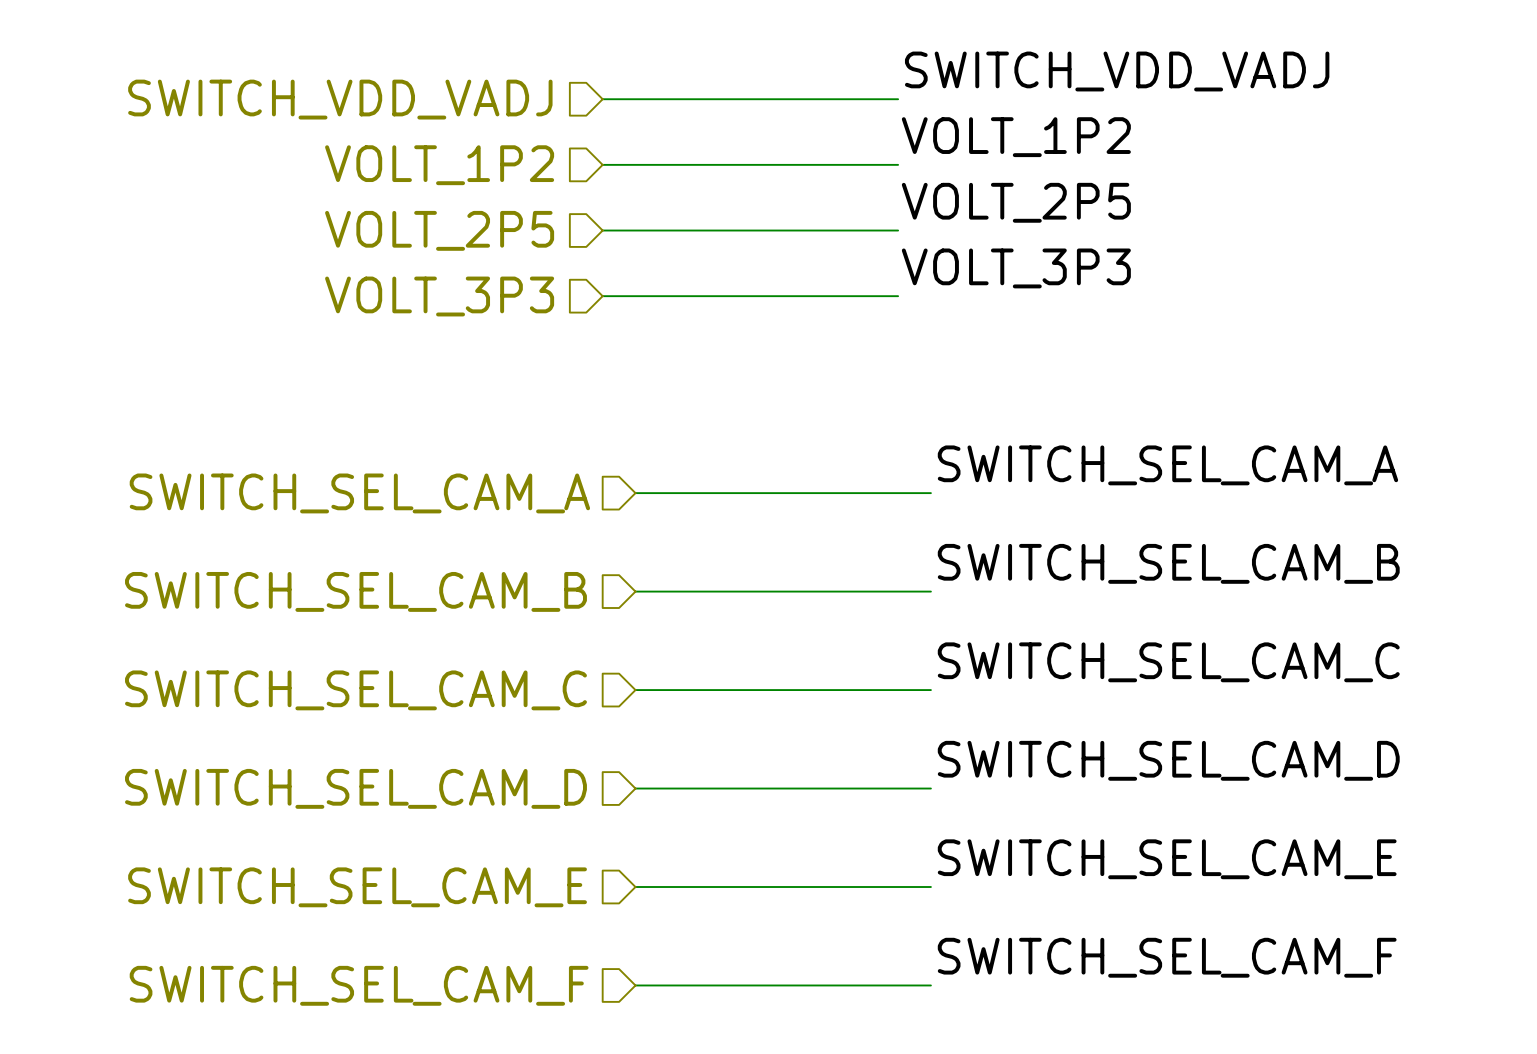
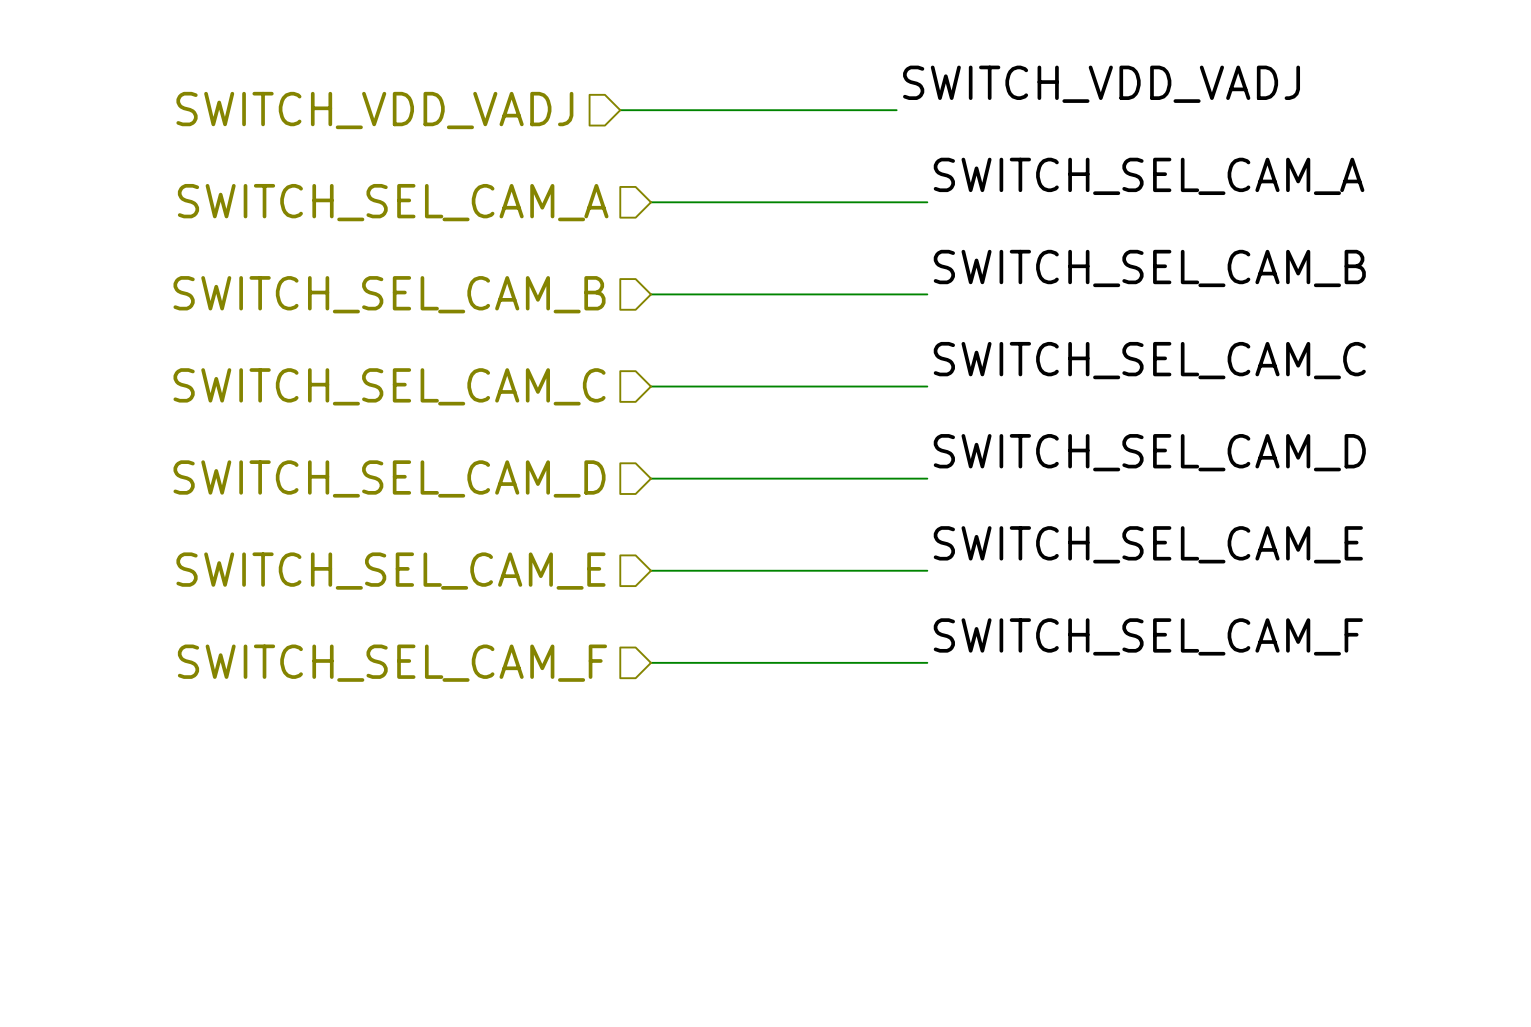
label: VOLT_1P2 (1016, 137) -> none
wire: (602, 164) (898, 164) -> none
hierarchical label: VOLT_1P2 (439, 165) -> none
label: none -> SWITCH_SEL_CAM_A (1149, 176)
hierarchical label: none -> SWITCH_SEL_CAM_A (393, 202)
label: VOLT_2P5 (1016, 202) -> none
hierarchical label: VOLT_2P5 (439, 230) -> none
wire: (602, 230) (898, 230) -> none
label: VOLT_3P3 (1016, 268) -> none
label: none -> SWITCH_SEL_CAM_B (1149, 268)
hierarchical label: none -> SWITCH_SEL_CAM_B (389, 294)
hierarchical label: VOLT_3P3 (439, 296) -> none
wire: (602, 296) (635, 296) -> (896, 294) (927, 294)
label: none -> SWITCH_SEL_CAM_C (1149, 360)
hierarchical label: none -> SWITCH_SEL_CAM_C (389, 386)
label: SWITCH_SEL_CAM_A (1167, 465) -> SWITCH_SEL_CAM_D (1149, 452)
hierarchical label: SWITCH_SEL_CAM_A (359, 493) -> SWITCH_SEL_CAM_D (389, 478)
label: SWITCH_SEL_CAM_B (1168, 563) -> SWITCH_SEL_CAM_E (1148, 544)
hierarchical label: SWITCH_SEL_CAM_B (355, 591) -> SWITCH_SEL_CAM_E (390, 571)
label: SWITCH_SEL_CAM_C (1168, 662) -> SWITCH_SEL_CAM_F (1148, 636)
hierarchical label: SWITCH_SEL_CAM_C (355, 690) -> SWITCH_SEL_CAM_F (392, 663)
label: SWITCH_SEL_CAM_D (1168, 760) -> none
hierarchical label: SWITCH_SEL_CAM_D (355, 788) -> none
wire: (635, 788) (930, 788) -> (650, 202) (927, 202)
label: SWITCH_SEL_CAM_E (1167, 859) -> none
hierarchical label: SWITCH_SEL_CAM_E (357, 887) -> none
wire: (635, 887) (930, 887) -> none
label: SWITCH_SEL_CAM_F (1167, 957) -> none
hierarchical label: SWITCH_SEL_CAM_F (359, 985) -> none
wire: (635, 985) (930, 985) -> (650, 386) (927, 386)

